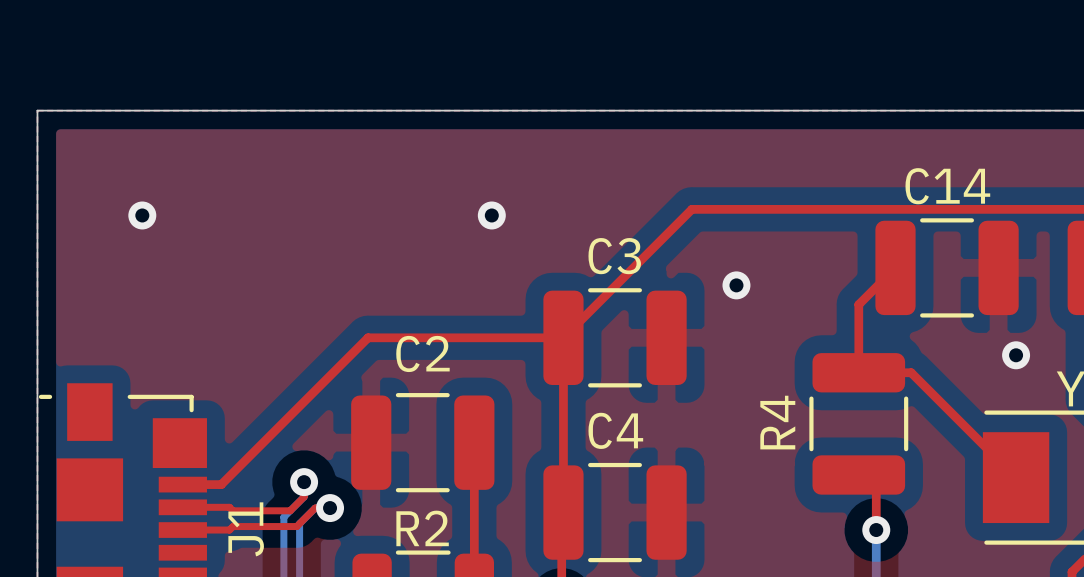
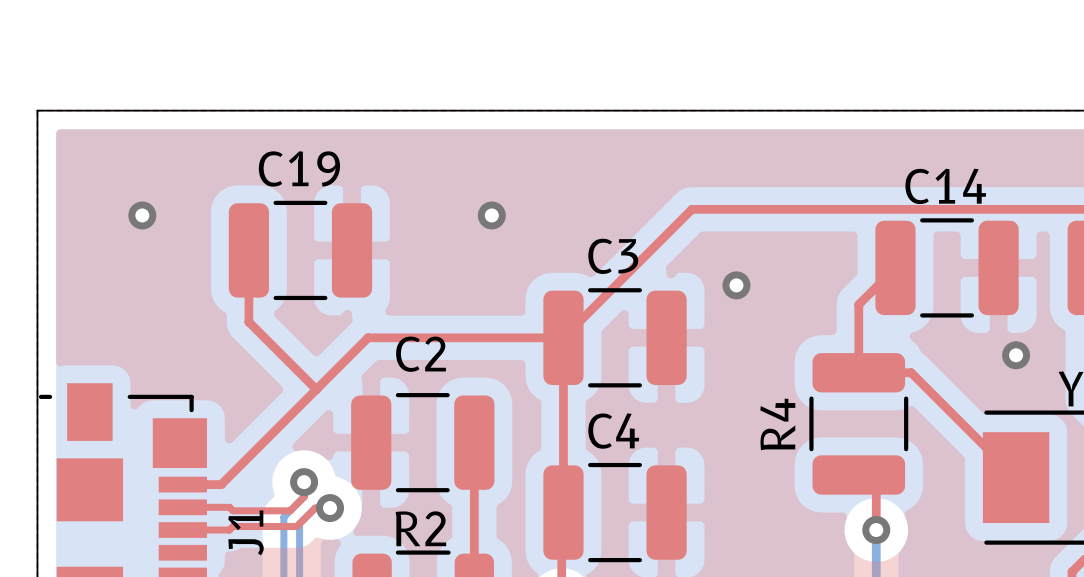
top track: none -> (248, 250) (248, 322) (316, 389)
C19: none -> (300, 250)

